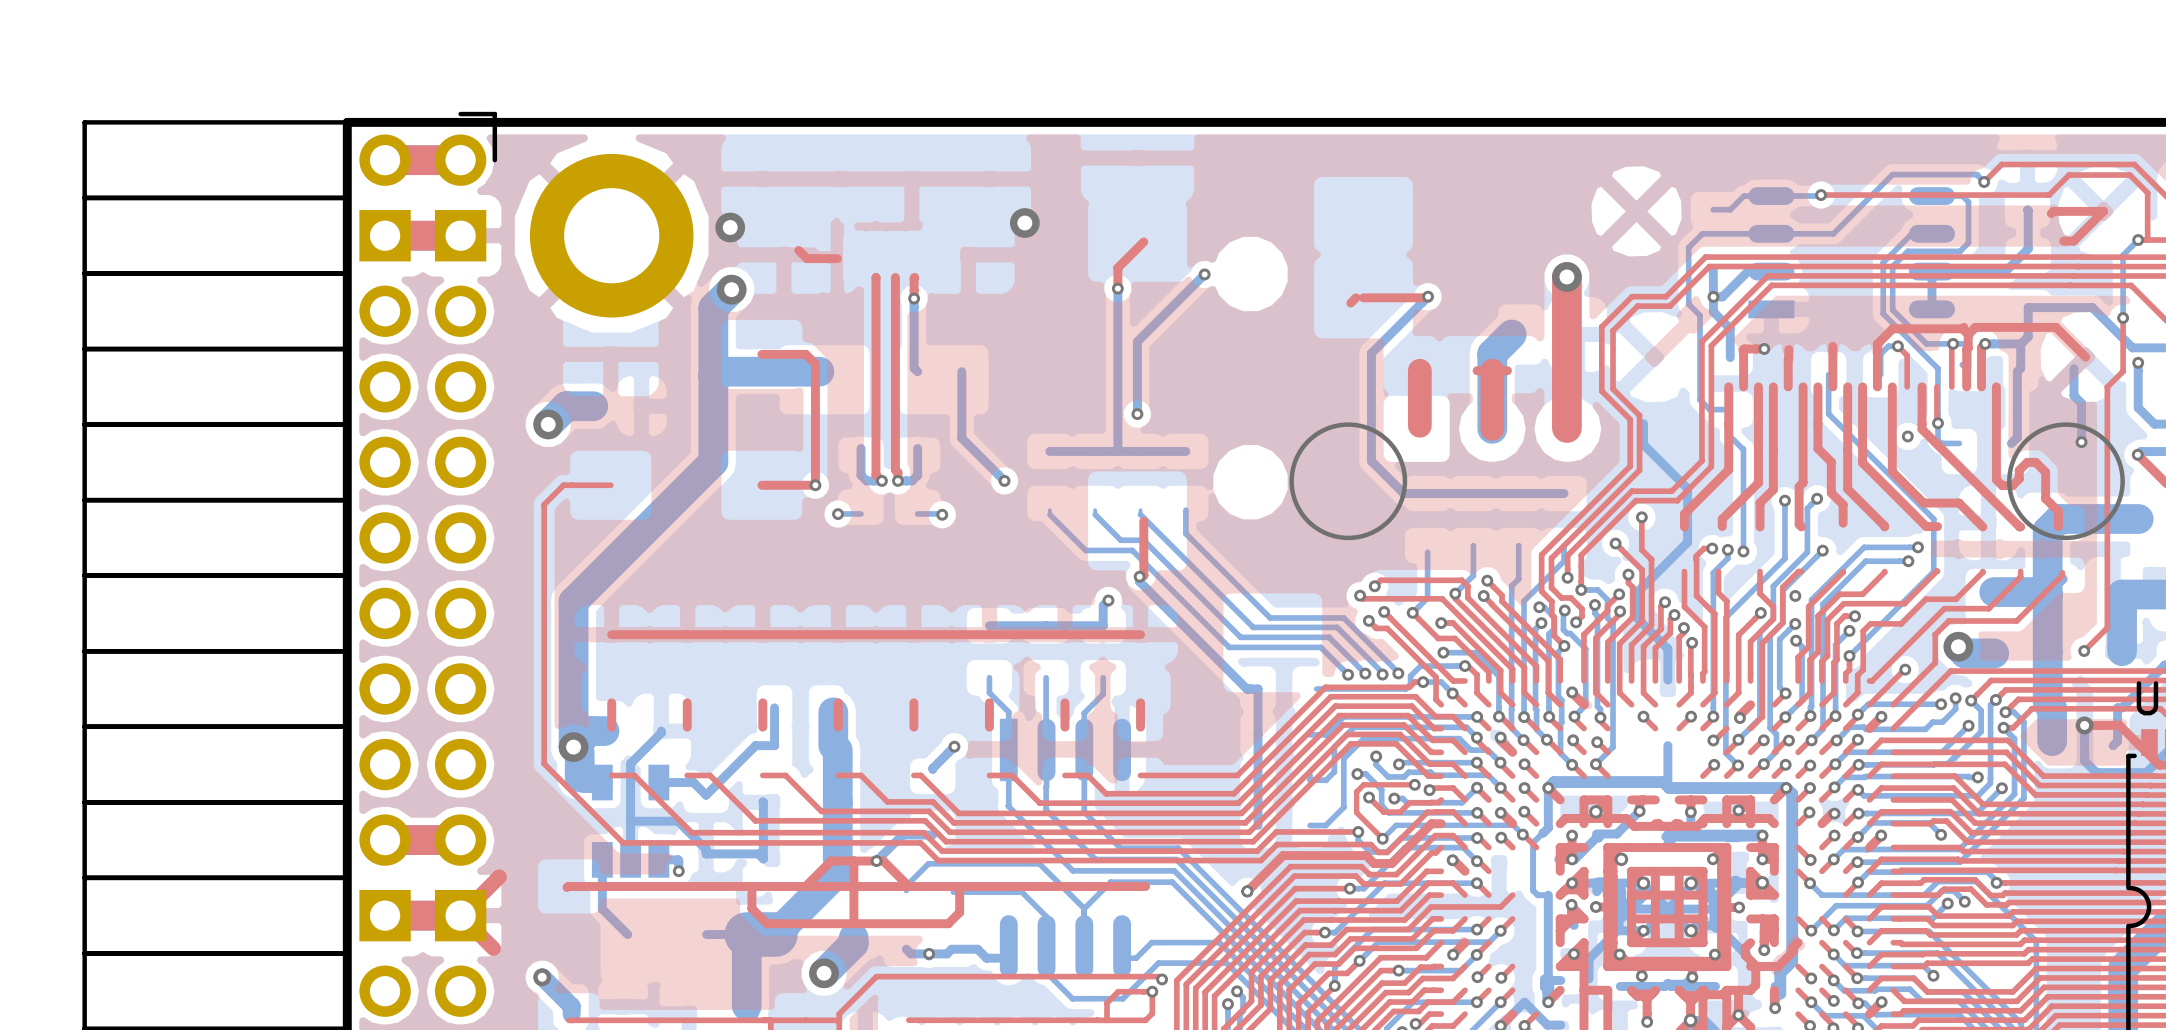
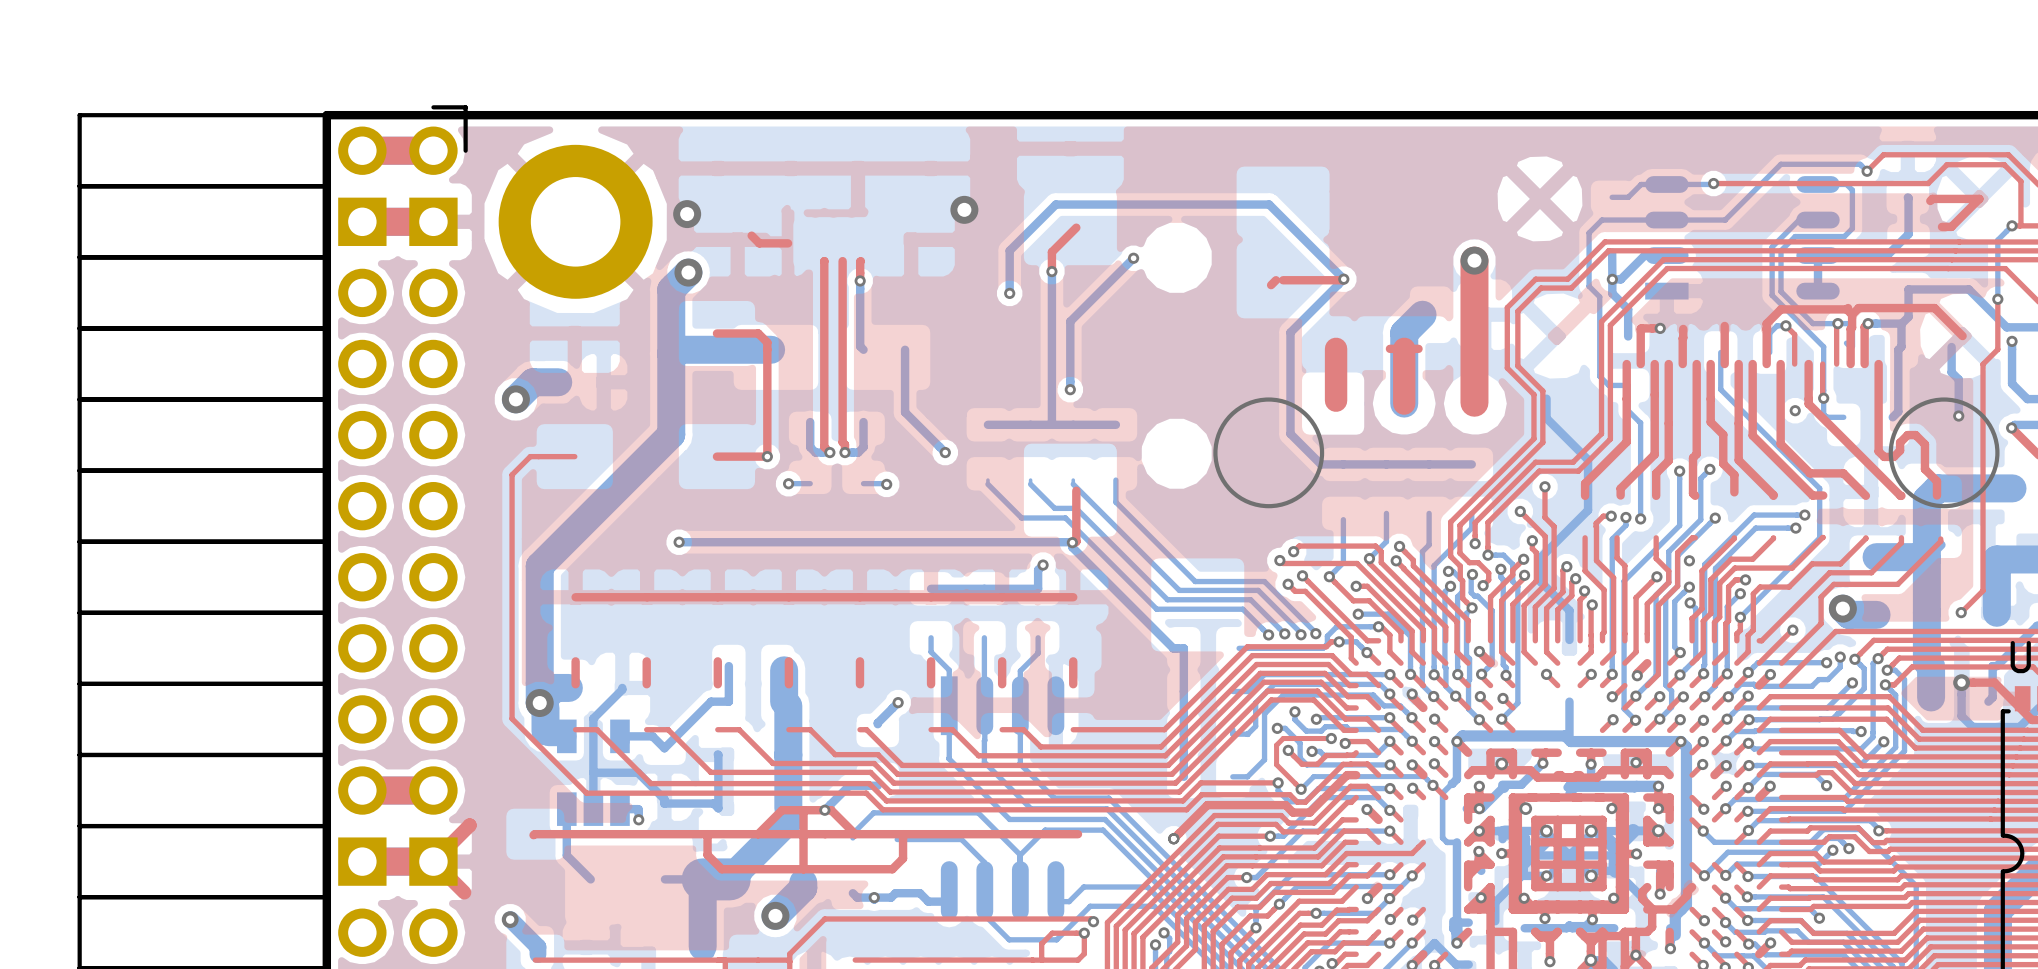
bottom track: none -> (1343, 279) (1269, 204) (1055, 204) (1009, 250) (1009, 293)
via: none -> (1009, 293)
bottom track: none -> (679, 542) (1072, 542)
via: none -> (679, 542)

